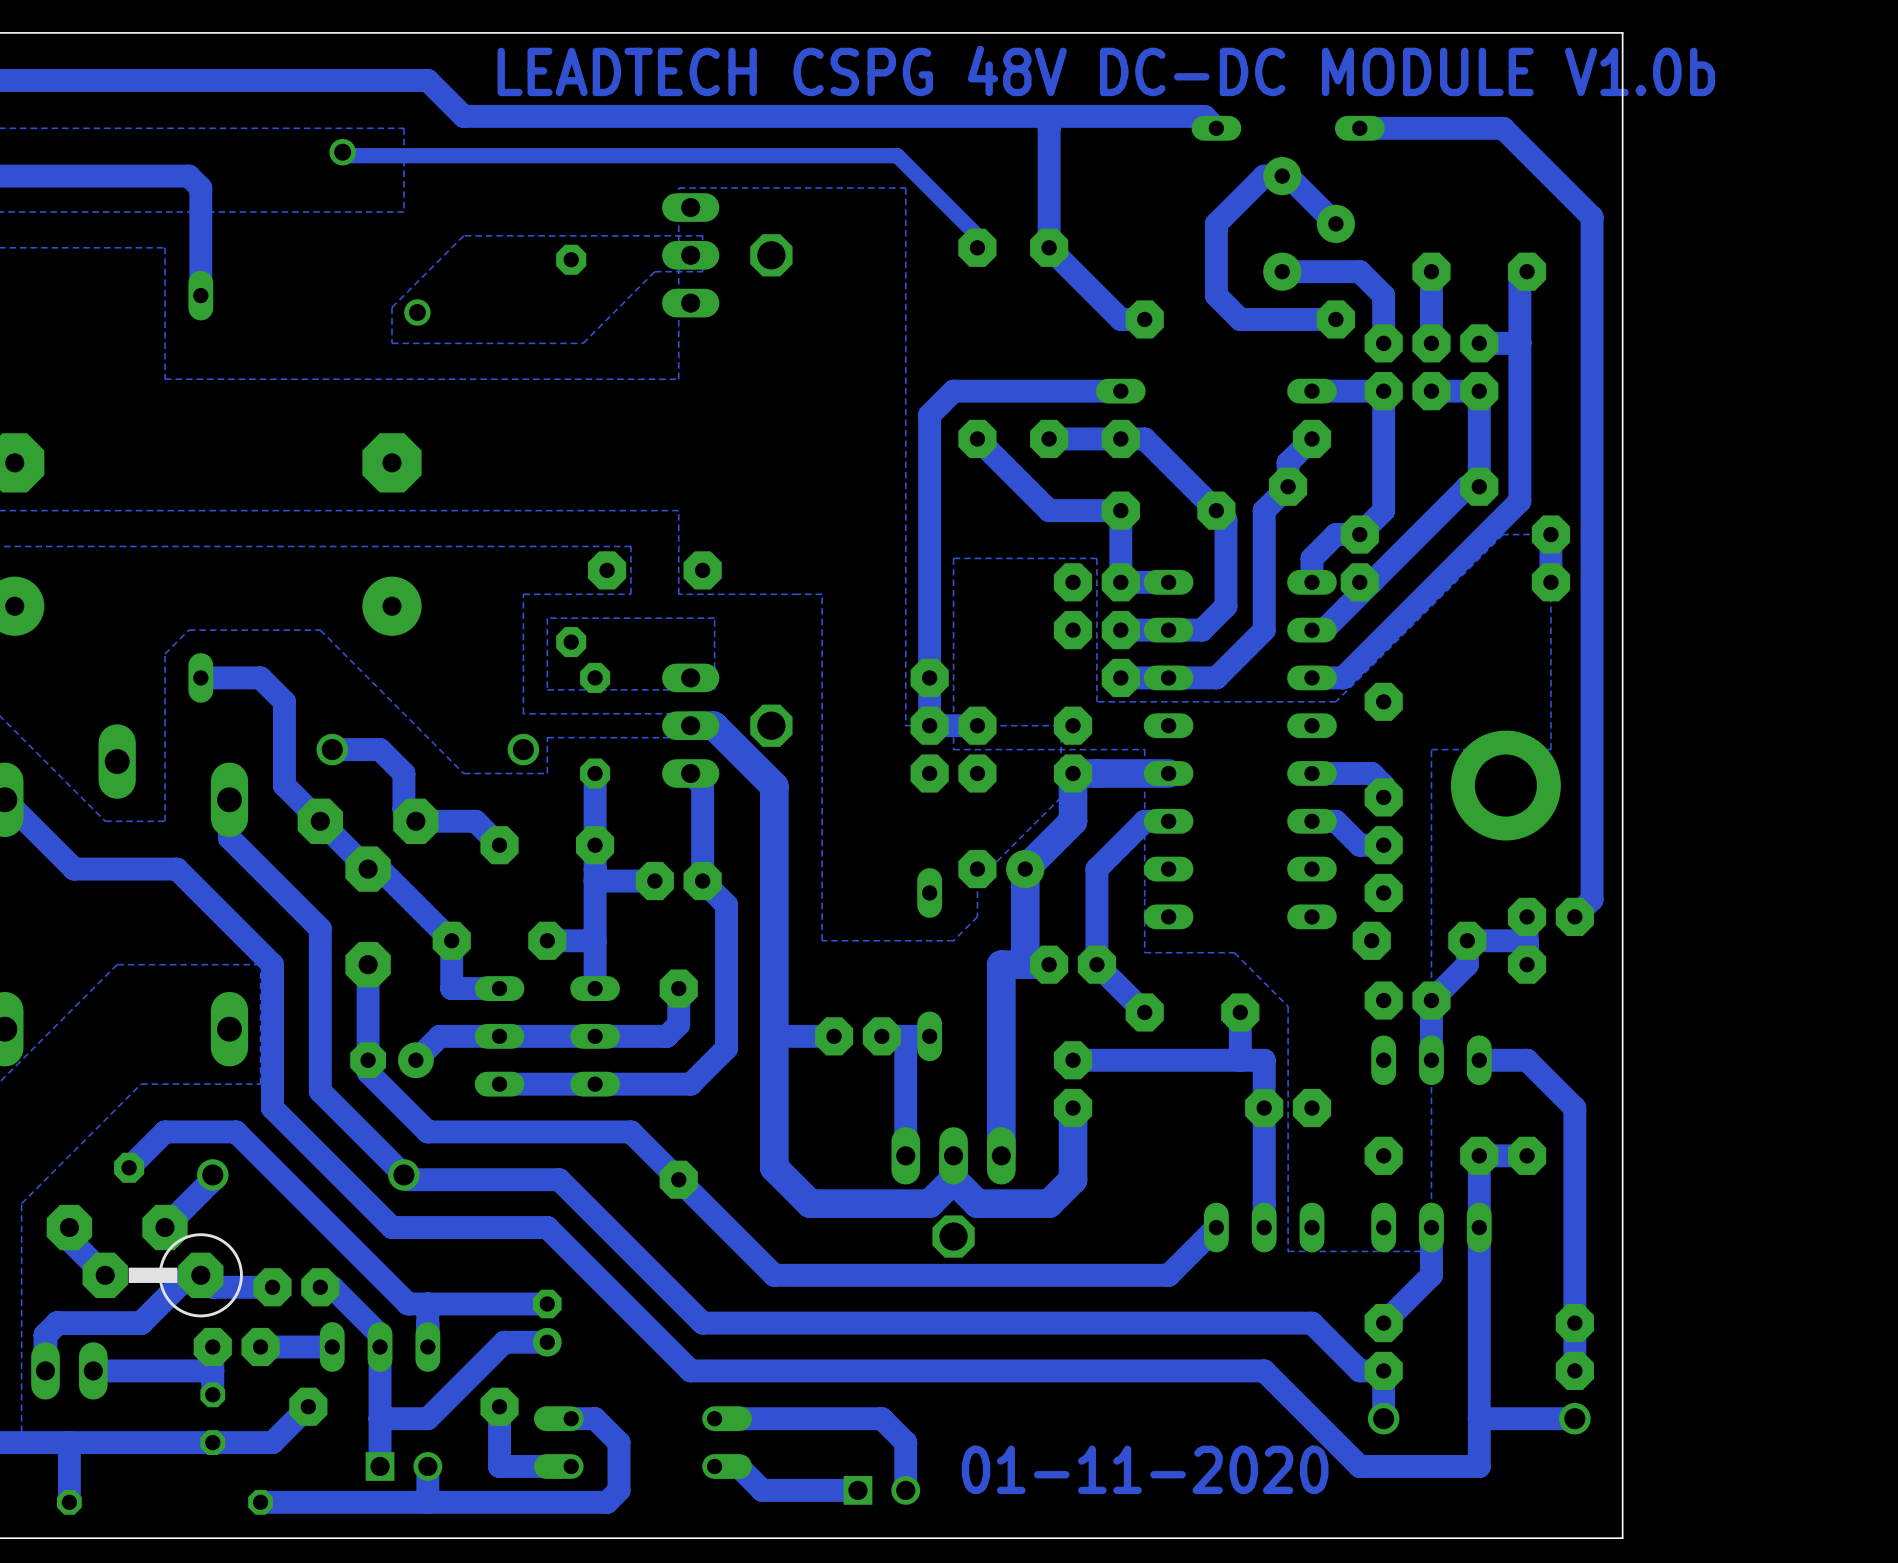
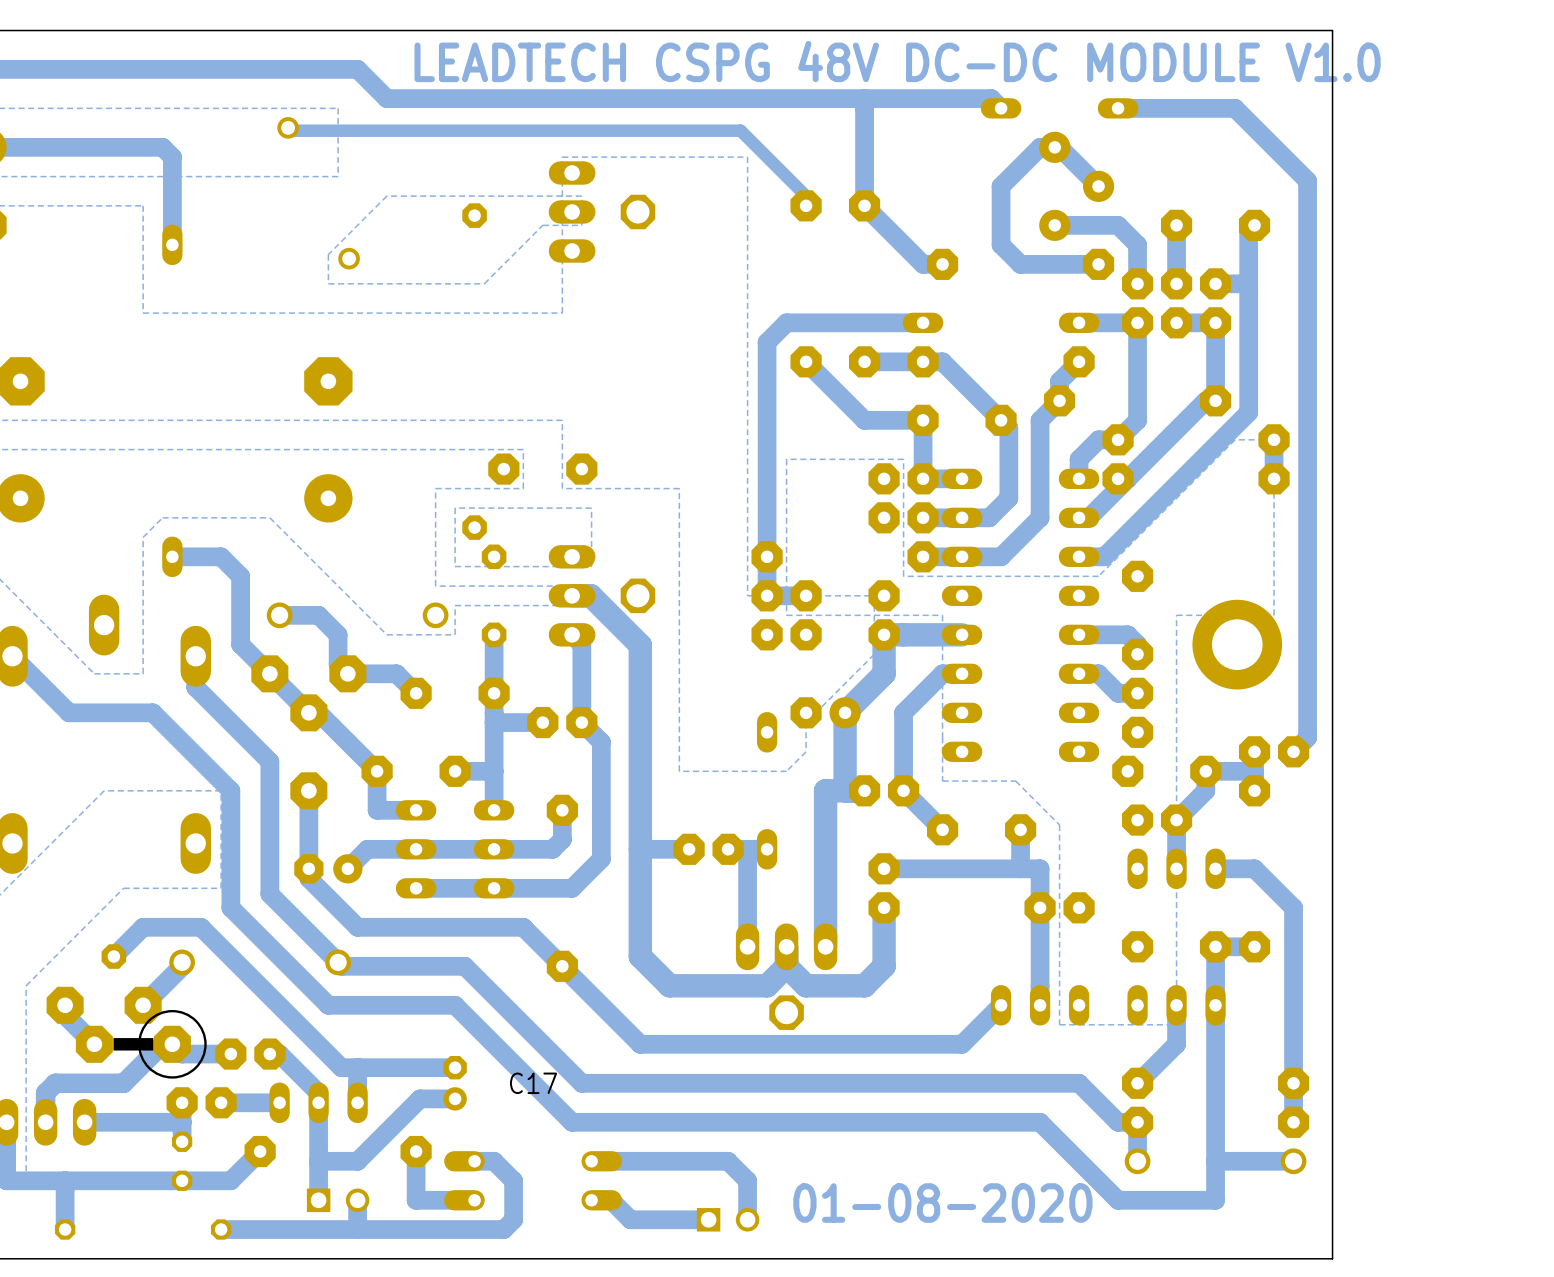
text: LEADTECH CSPG 48V DC-DC MODULE V1.0b (1106, 70) -> LEADTECH CSPG 48V DC-DC MODULE V1.0 (897, 61)
C17 name: none -> C17 (533, 1083)
text: 01-11-2020 (1145, 1469) -> 01-08-2020 (942, 1203)

